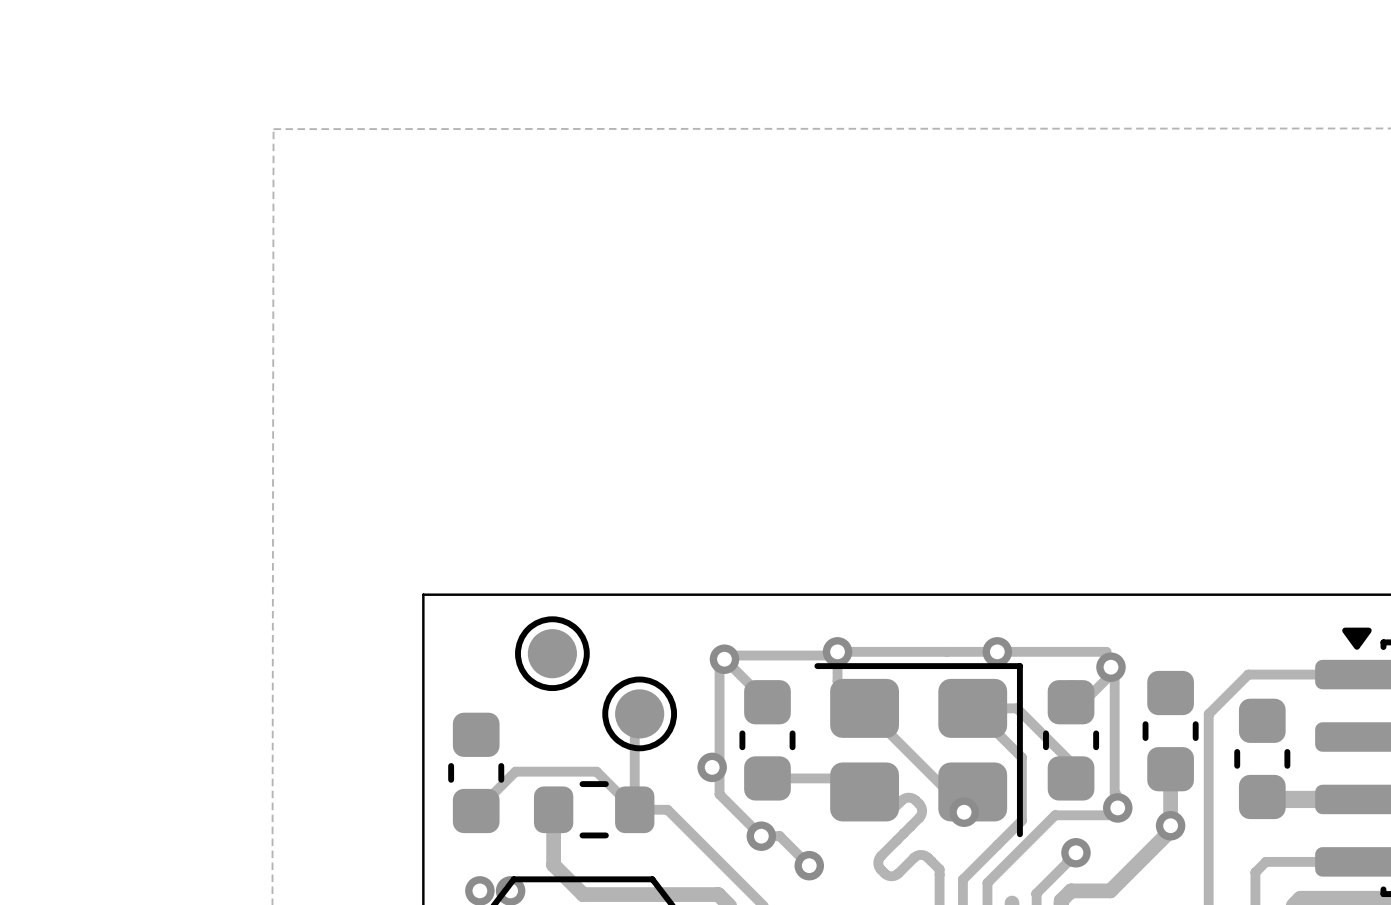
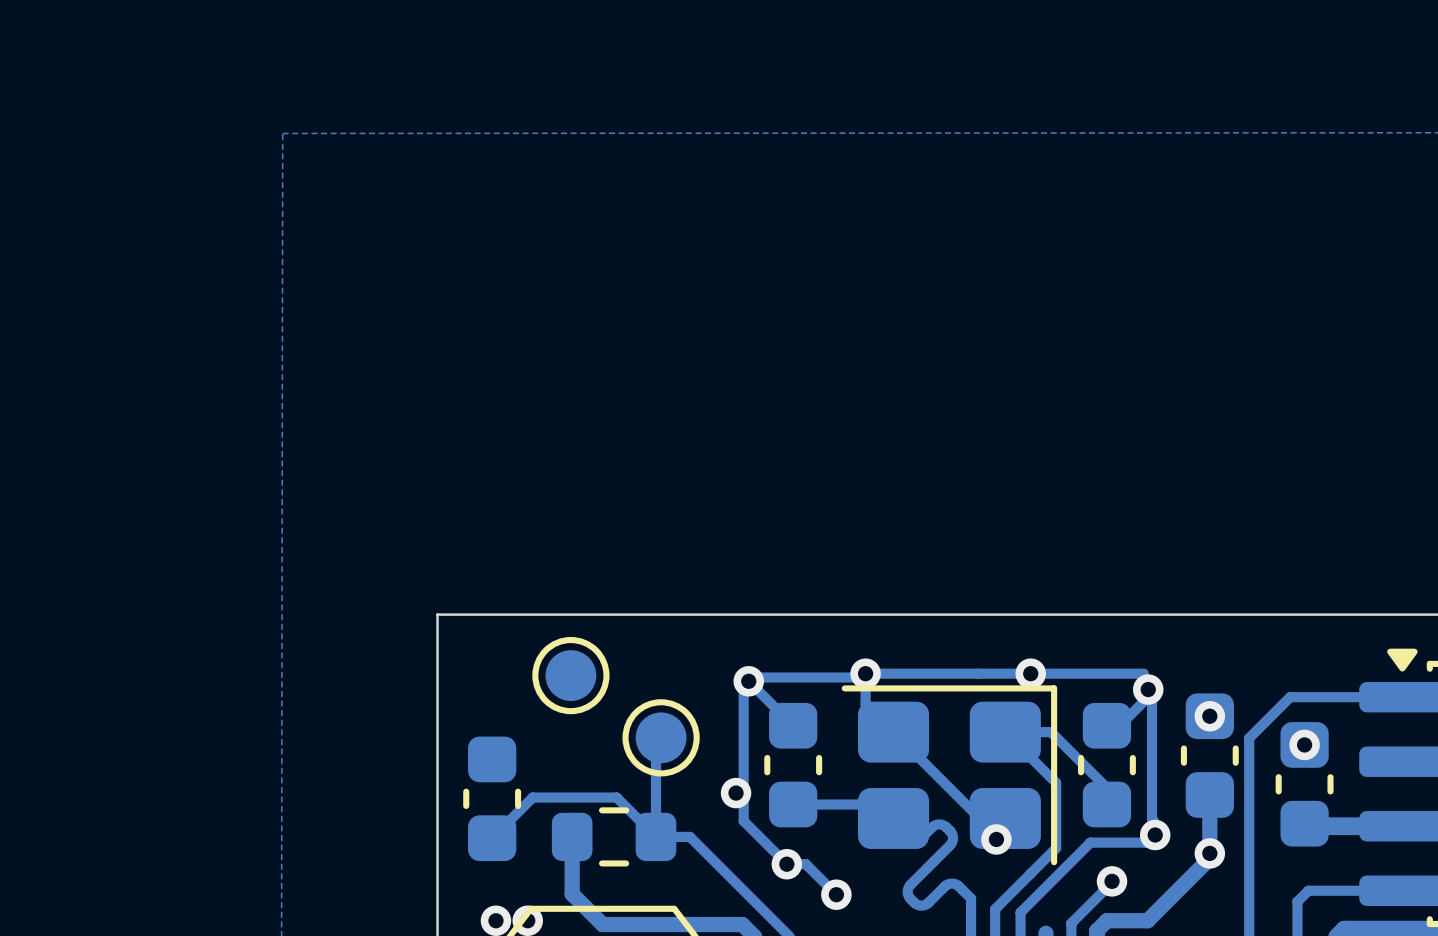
via: none -> (1209, 716)
via: none -> (1304, 744)

